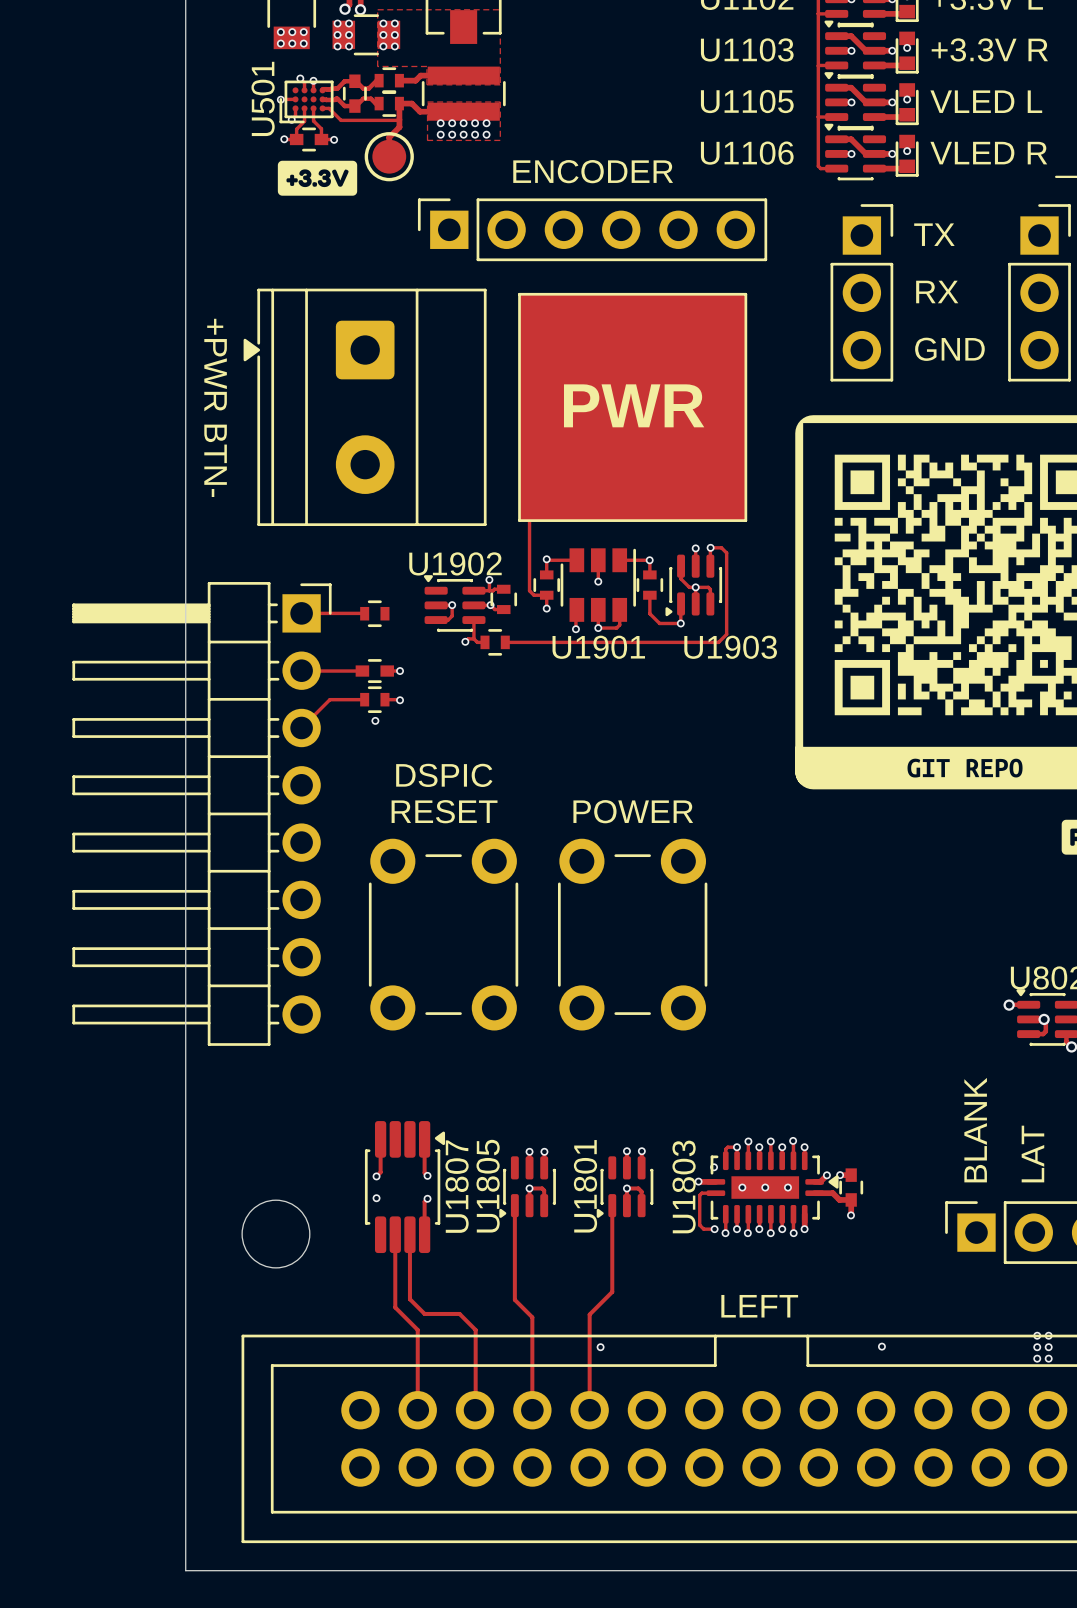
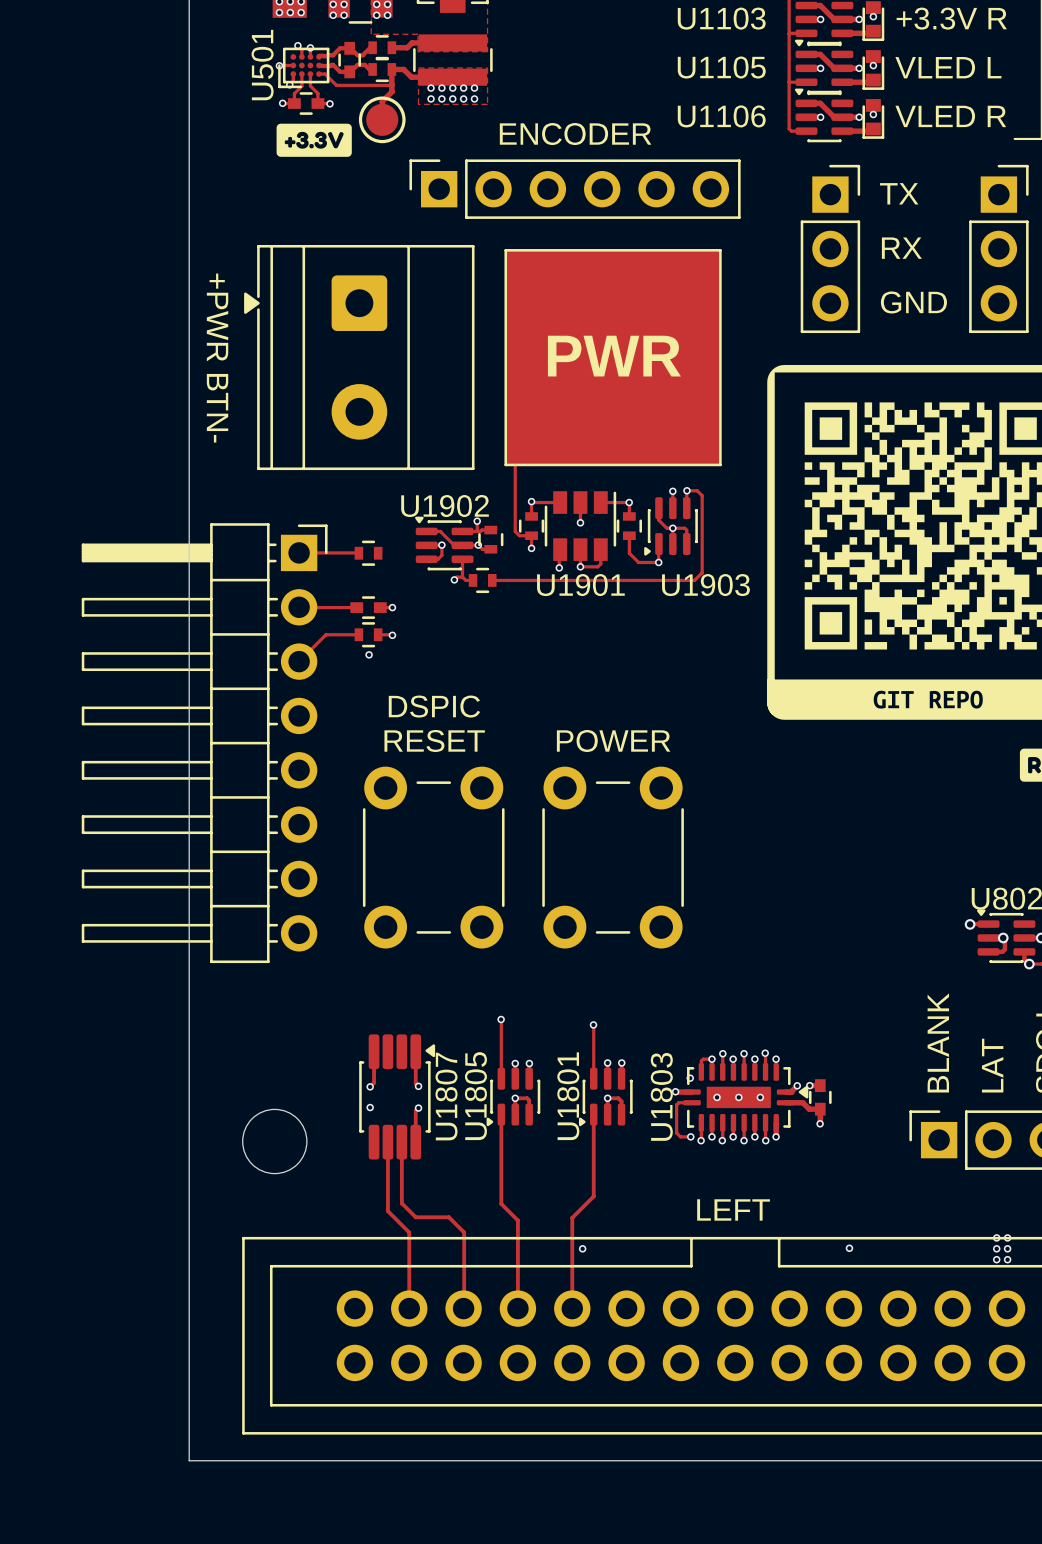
track: none -> (426, 531) (440, 531) (454, 545) (462, 545)
track: none -> (501, 1019) (501, 1078)
via: none -> (501, 1019)
track: none -> (593, 1025) (593, 1078)
via: none -> (593, 1024)

